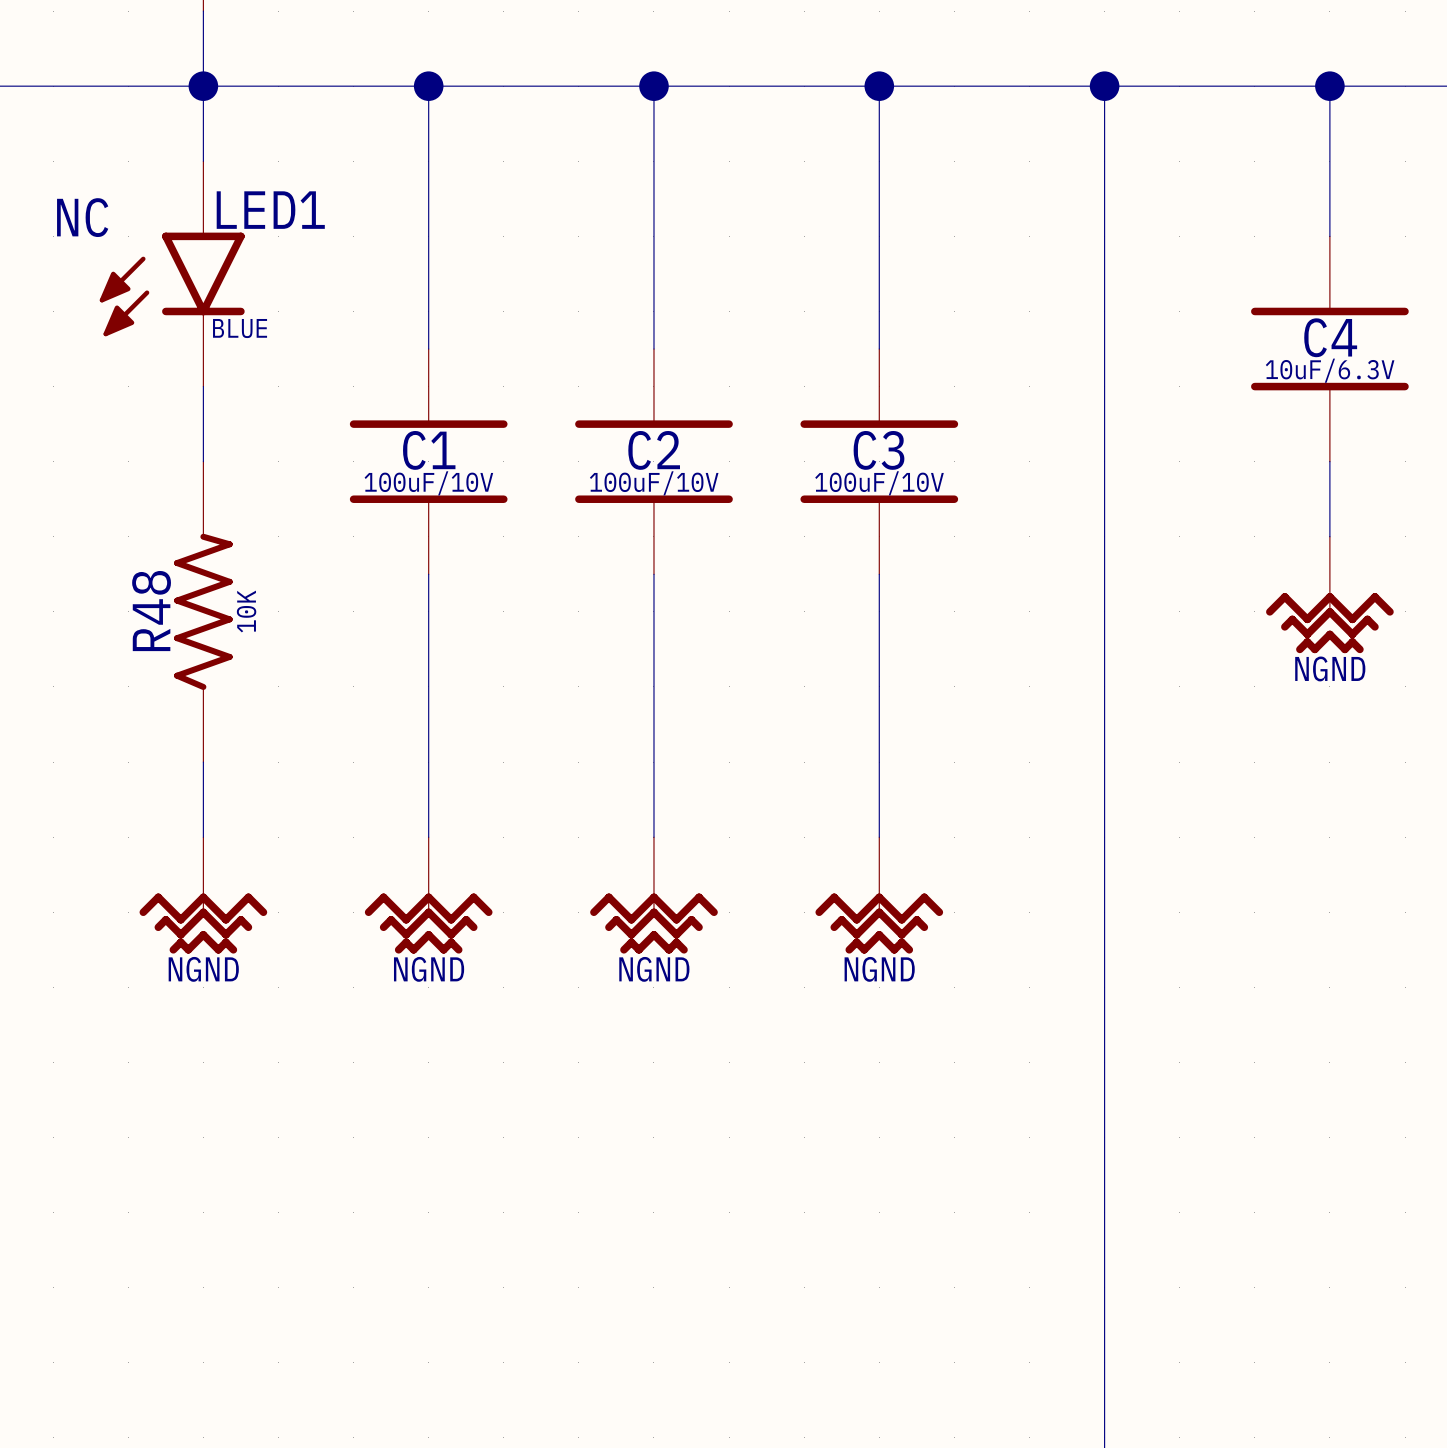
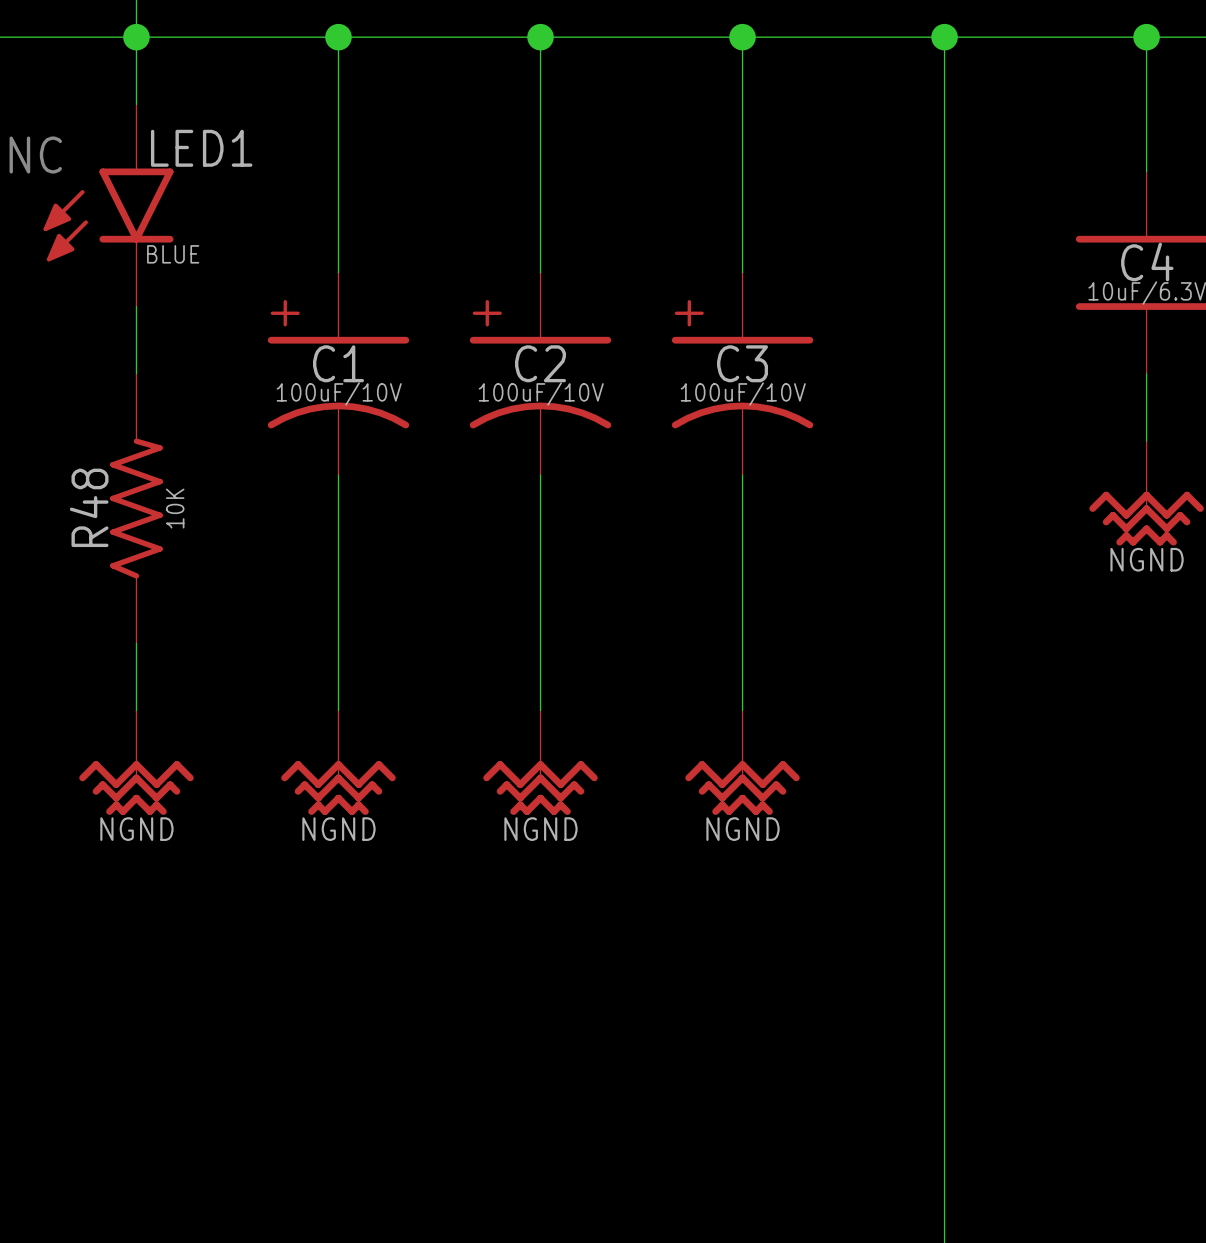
C1 symbol: [349, 349, 508, 575] -> [267, 272, 410, 475]
C2 symbol: [575, 349, 733, 575] -> [469, 272, 612, 475]
C3 symbol: [800, 349, 959, 575] -> [671, 272, 814, 475]

